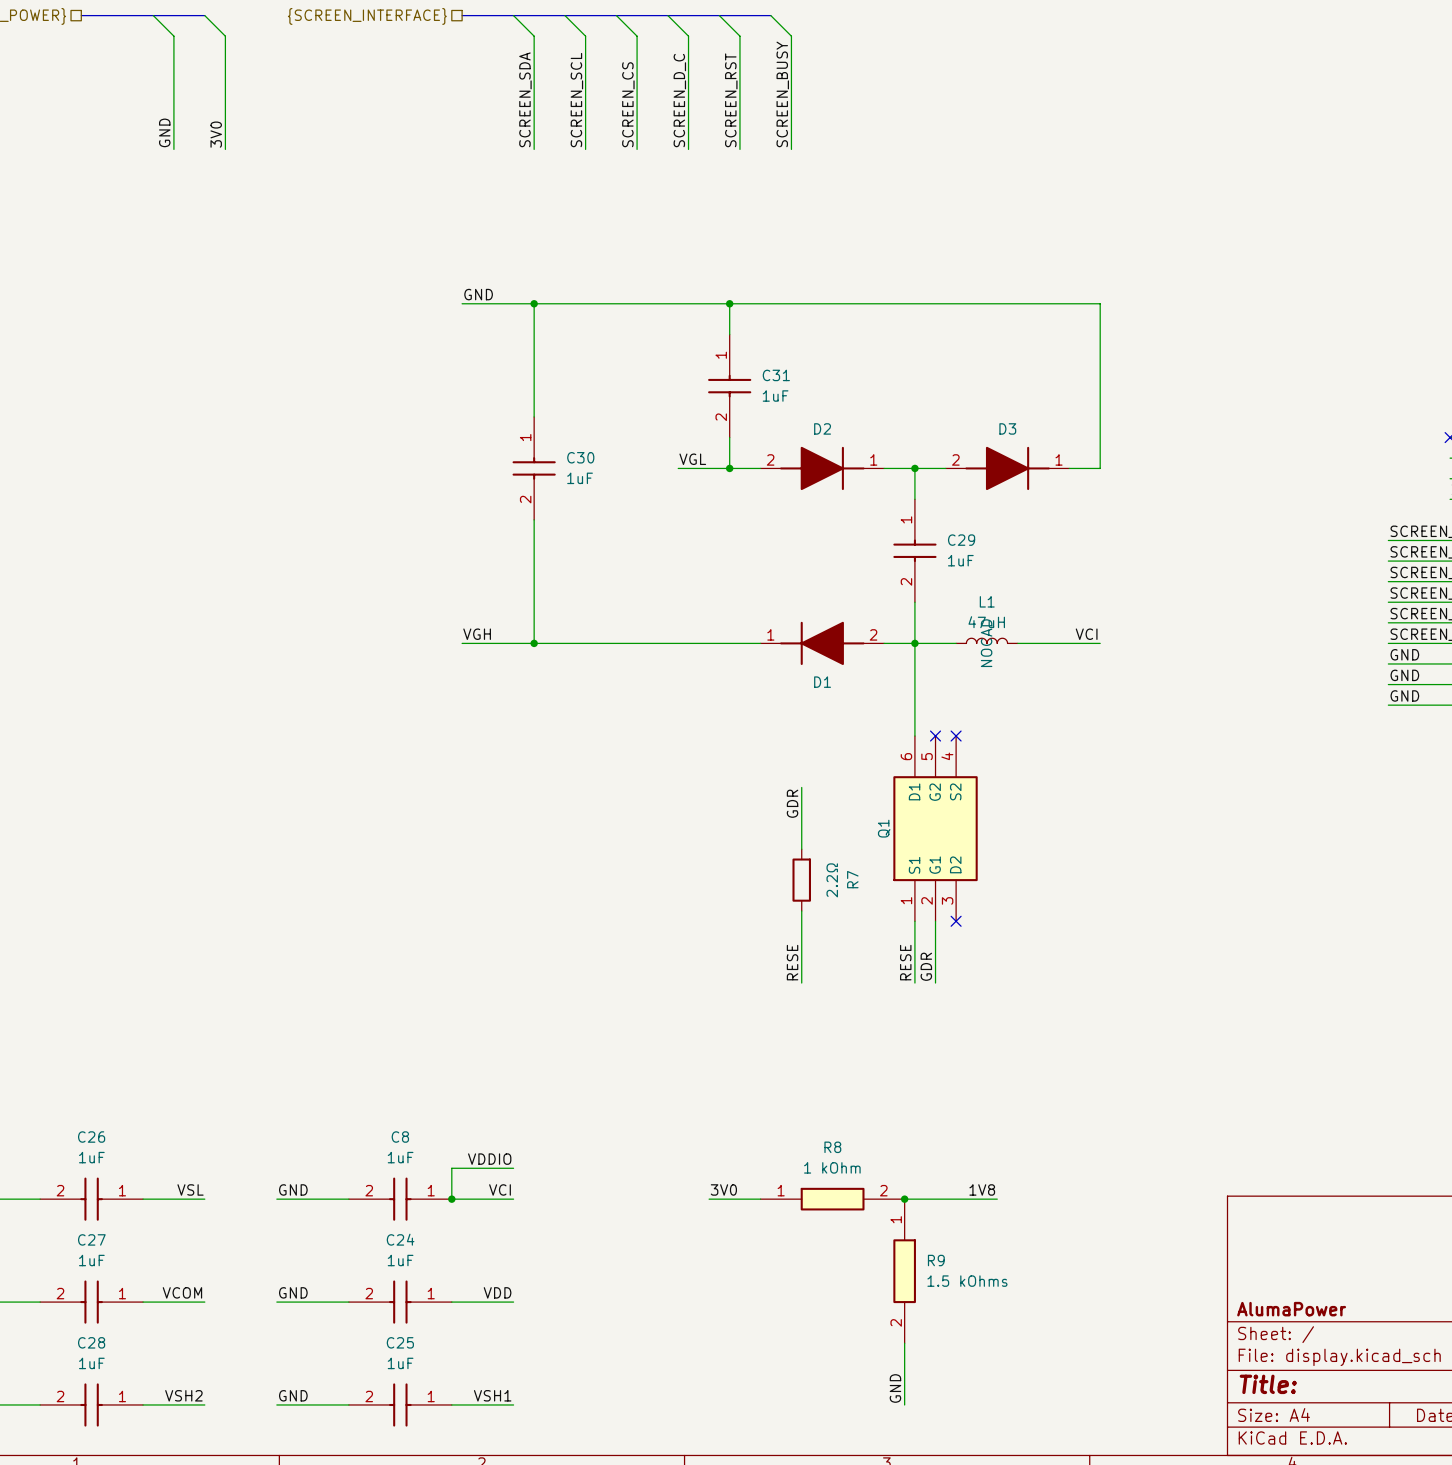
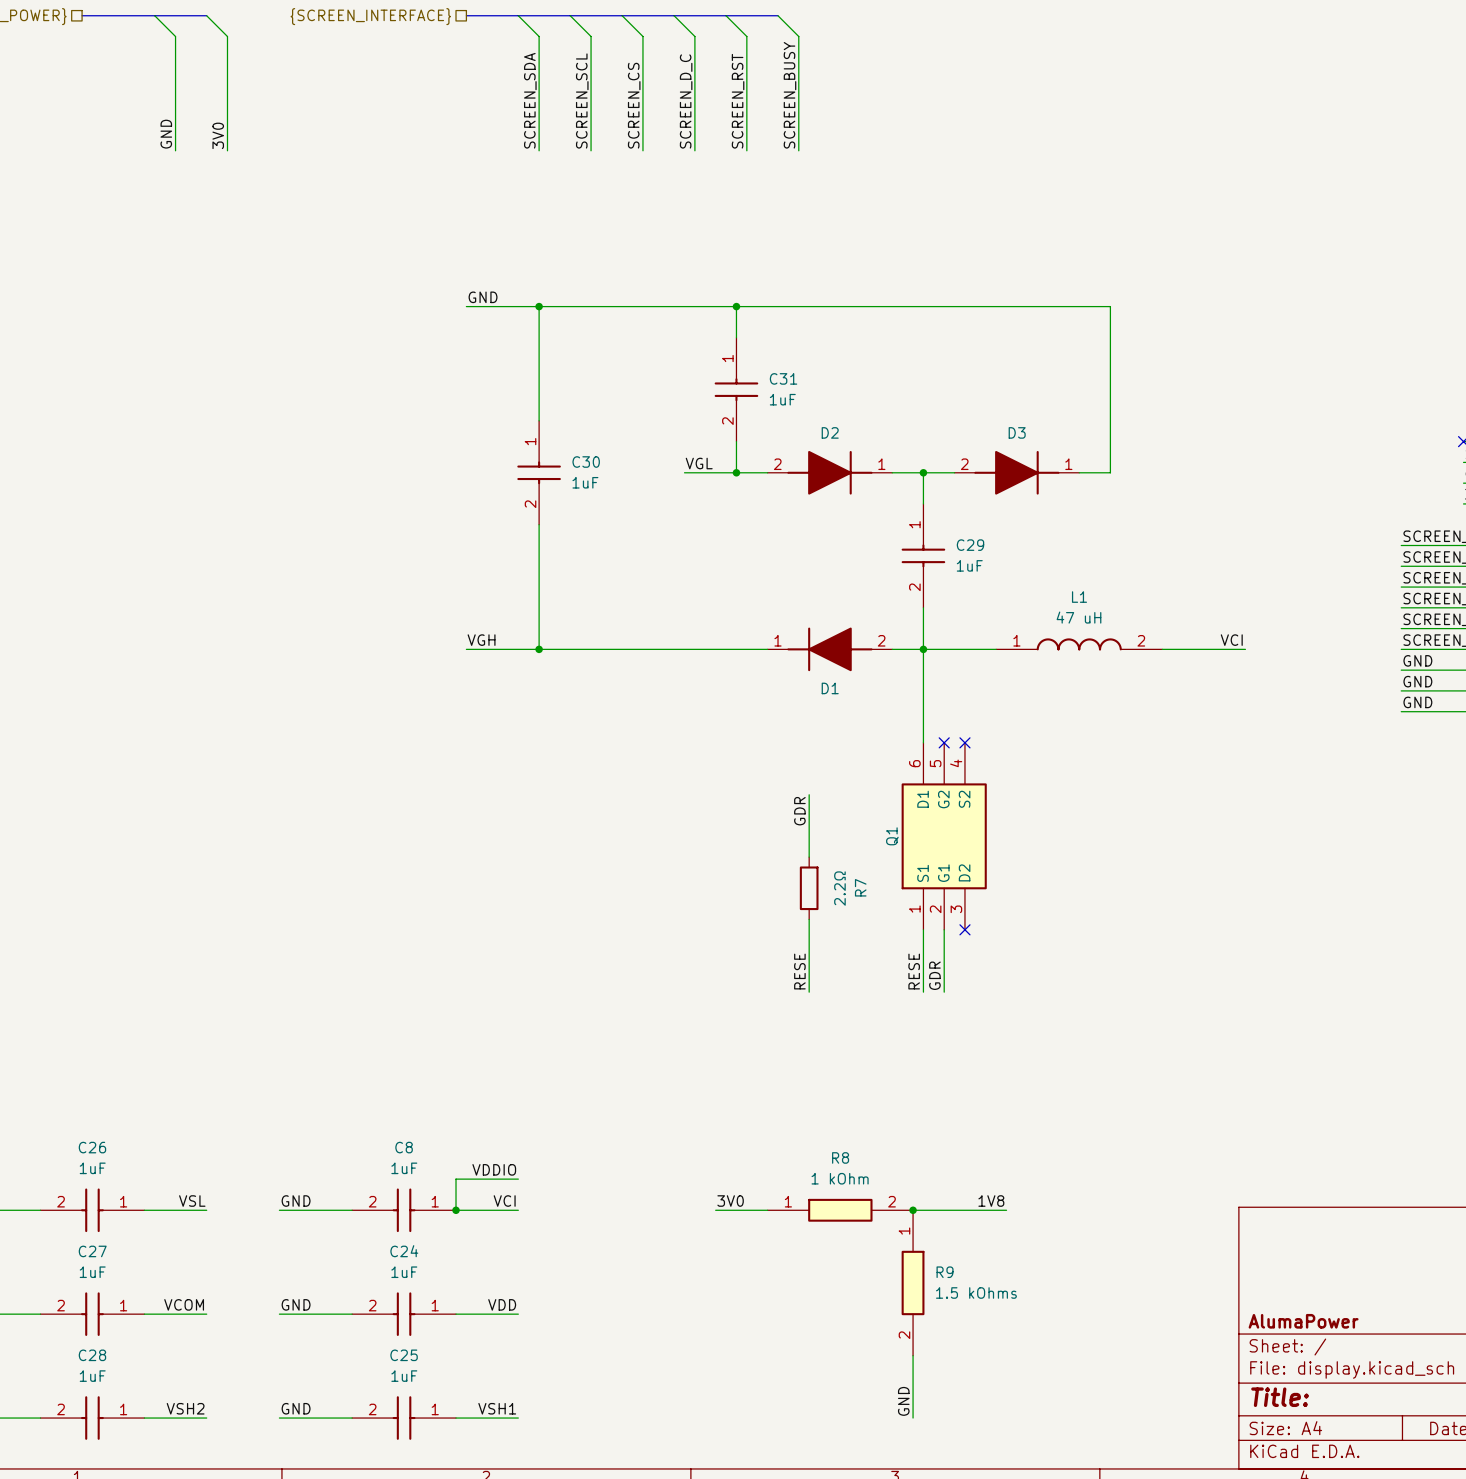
L1 value: 47uH (986, 622) -> 47 uH (1078, 617)
label position: VCI (1086, 634) -> VCI (1231, 640)
L1 symbol: [956, 638, 1018, 644] -> [996, 638, 1163, 651]
wire: none -> (964, 649) (996, 649)
L1 text: NOCAD (986, 643) -> none
wire: (1017, 643) (1100, 643) -> (1162, 649) (1245, 649)

